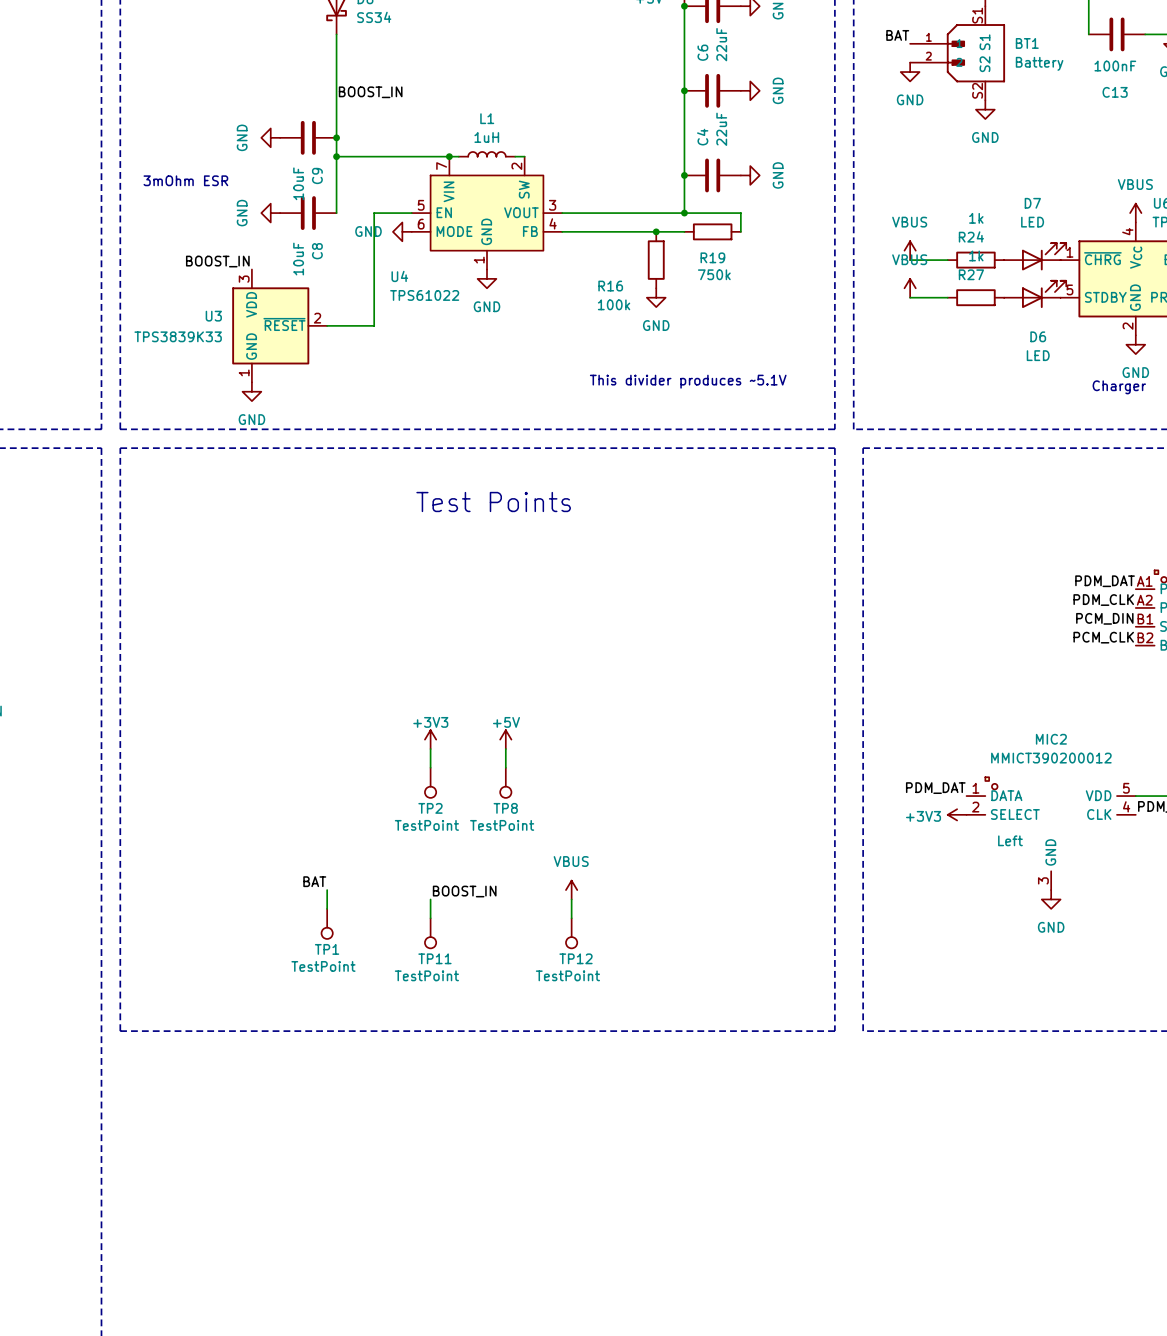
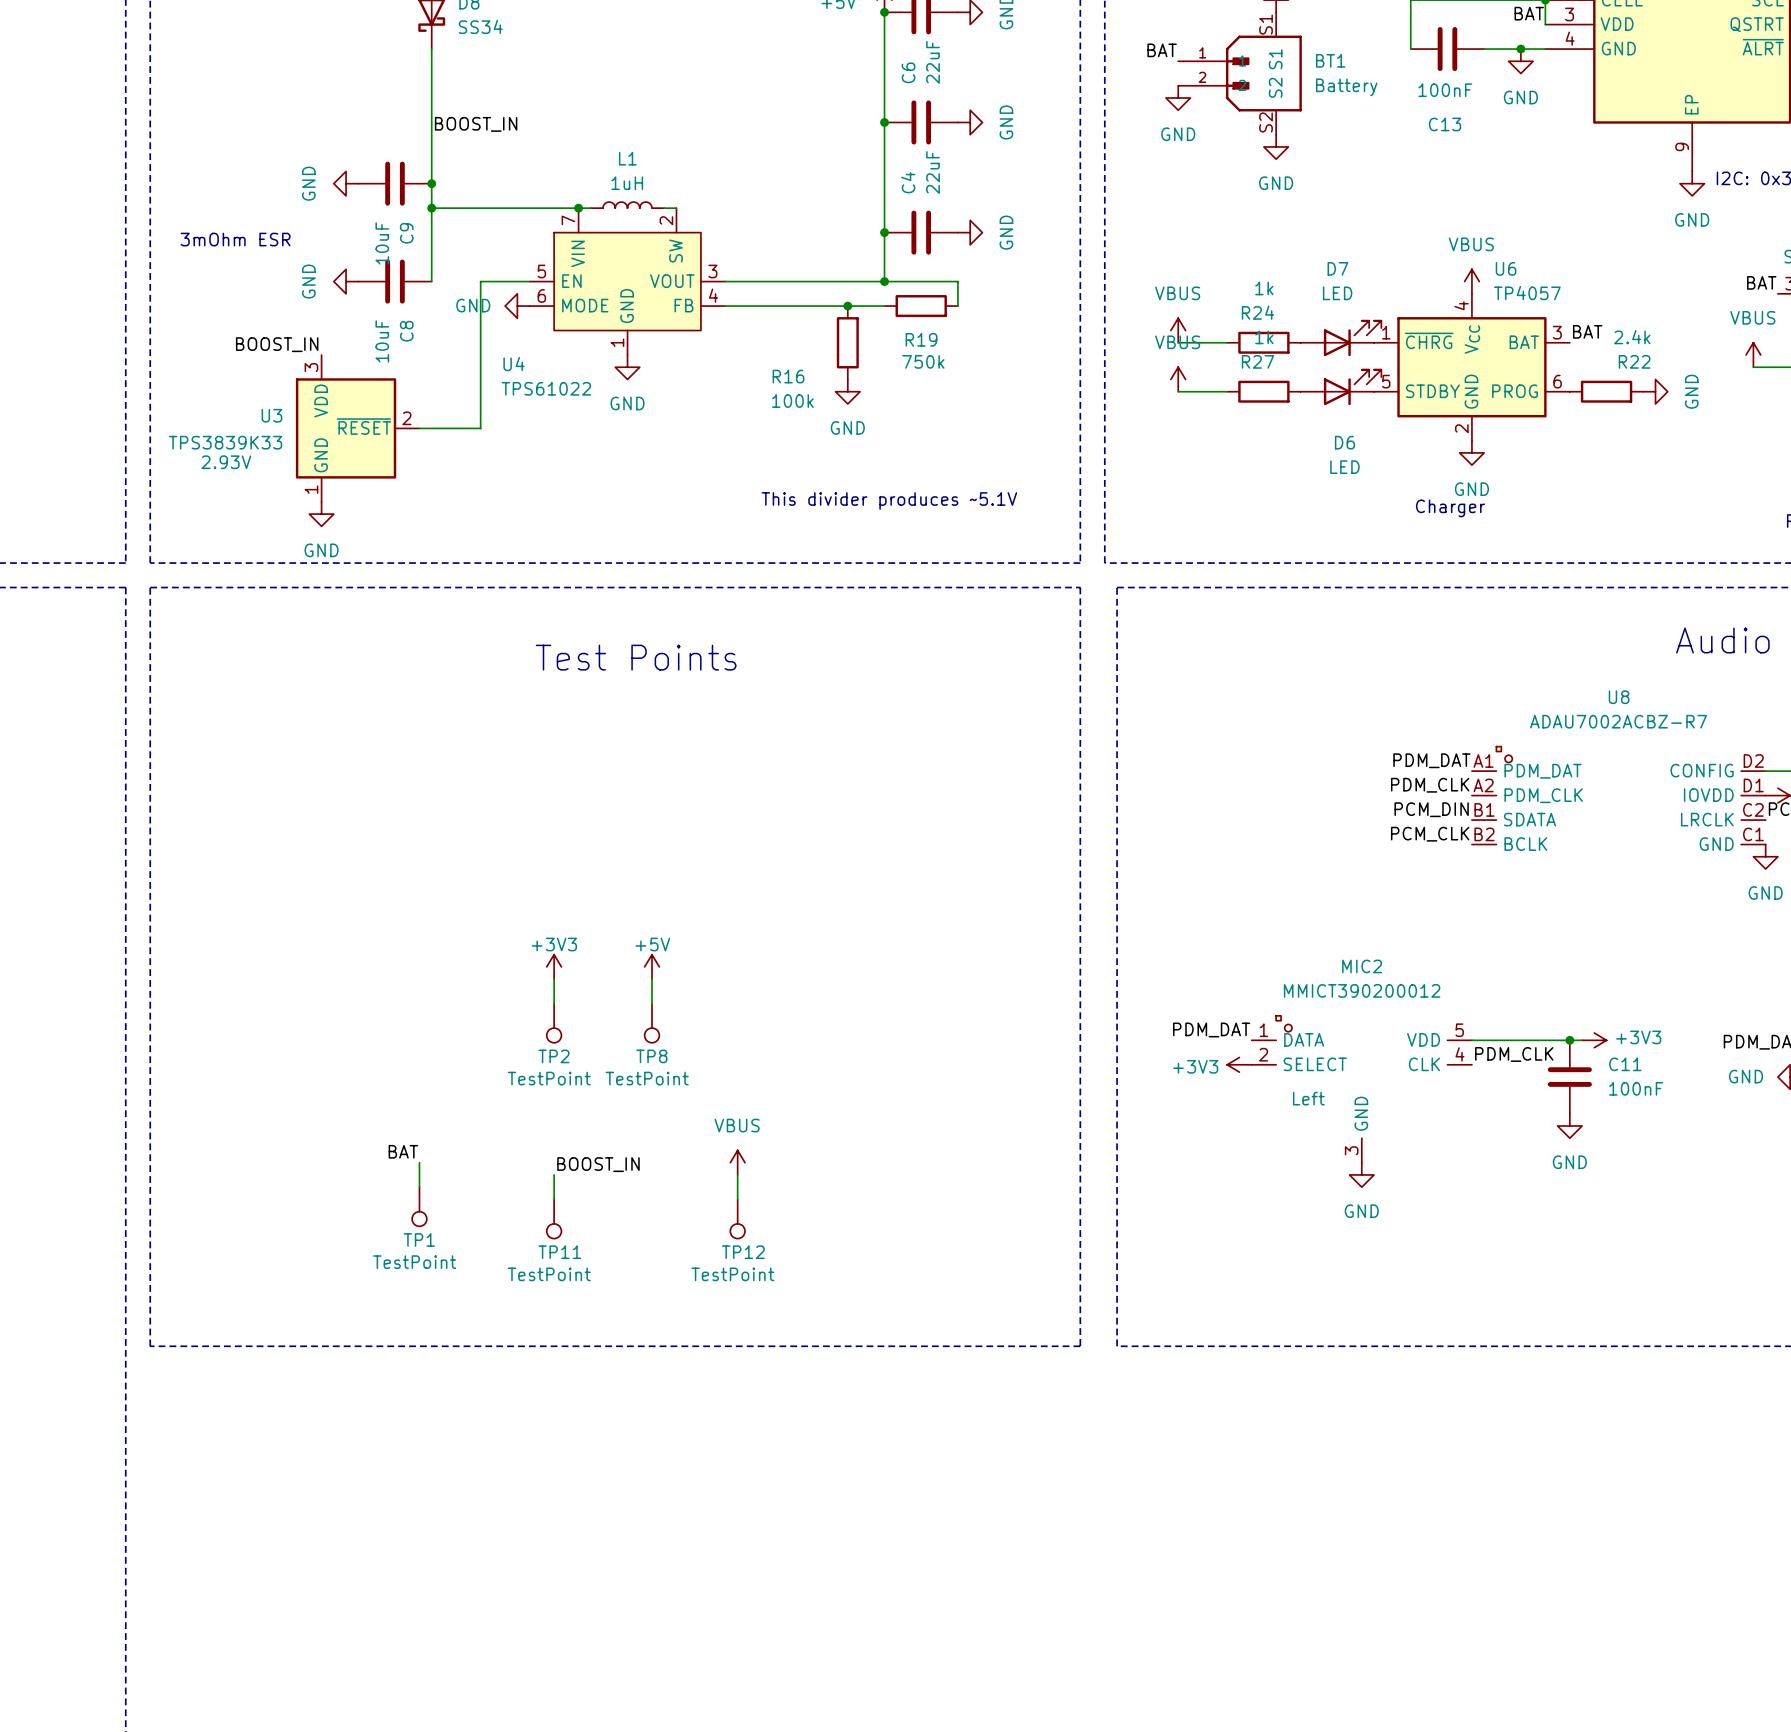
U3 text: none -> 2.93V (226, 462)

